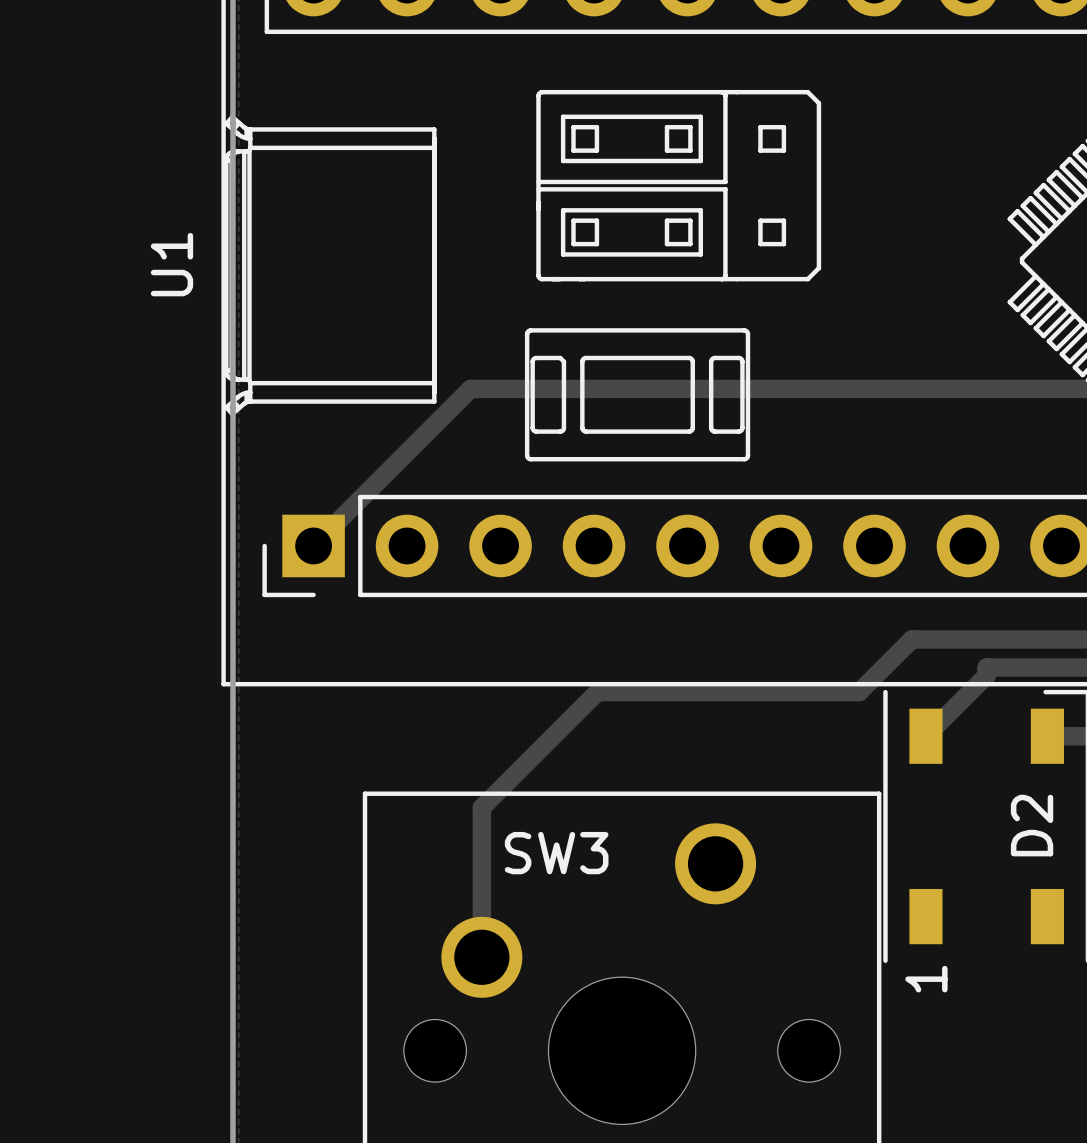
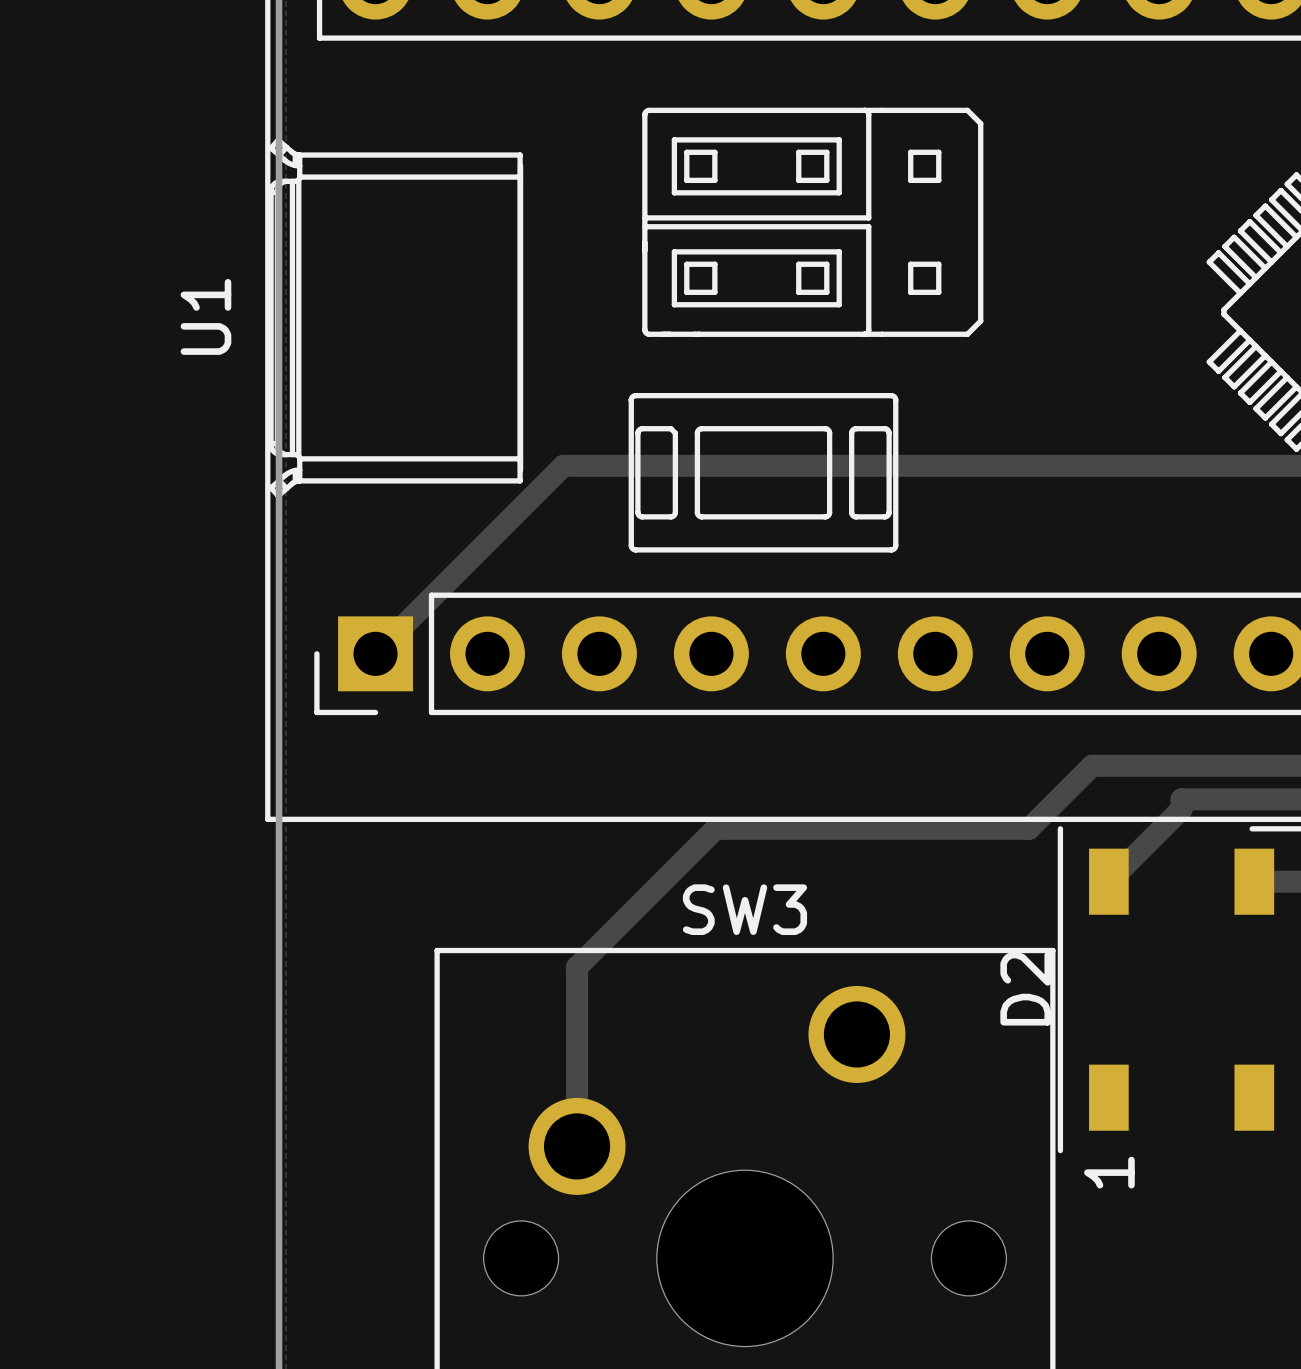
D2 name position: D2 (1032, 825) -> D2 (1025, 988)
SW3 name position: SW3 (556, 853) -> SW3 (744, 909)

